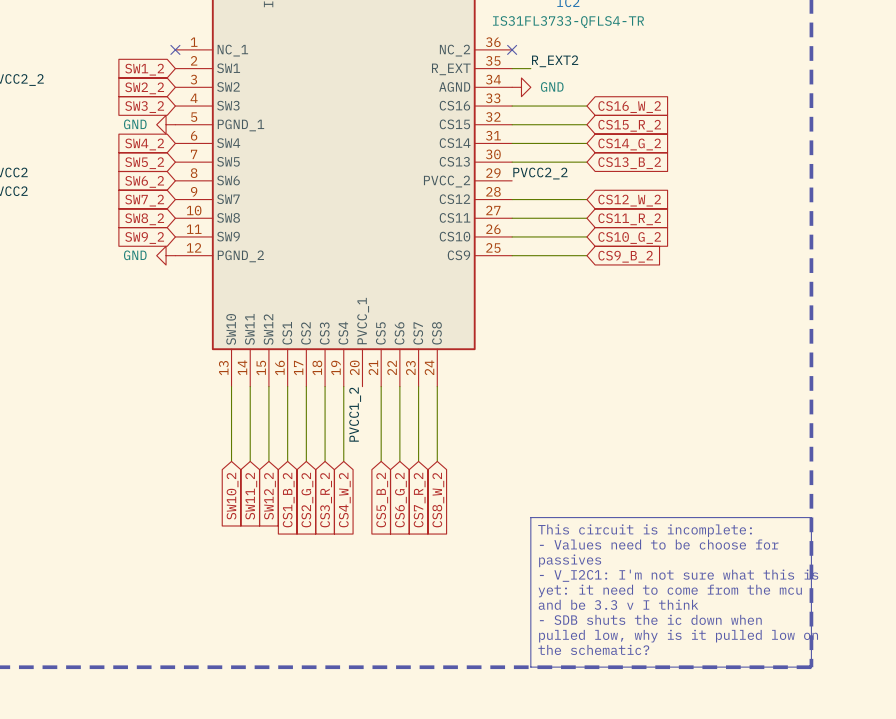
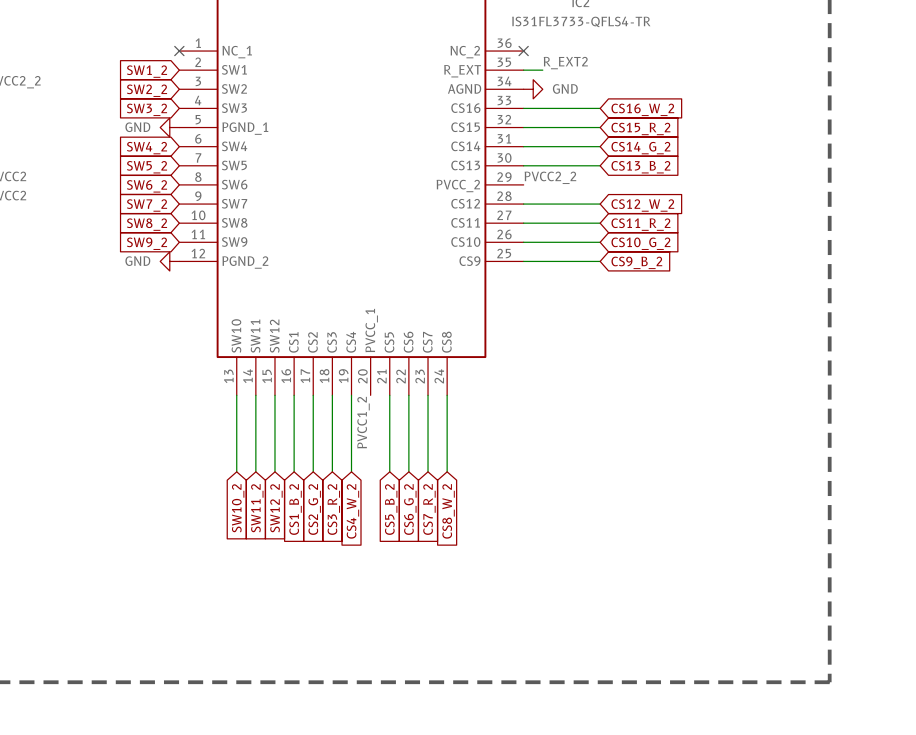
line: (530, 517) (811, 517) (811, 667) (530, 667) (530, 517) -> none
text: This circuit is incomplete: (645, 530) -> none
text: - Values need to be choose for (659, 544) -> none
text: passives (570, 560) -> none
text: - V_I2C1: I'm not sure what this is (679, 575) -> none
text: yet: it need to come from the mcu (670, 590) -> none
text: and be 3.3 v I think (618, 604) -> none
text: - SDB shuts the ic down when (650, 619) -> none
text: pulled low, why is it pulled low on (678, 636) -> none
text: the schematic? (593, 649) -> none

